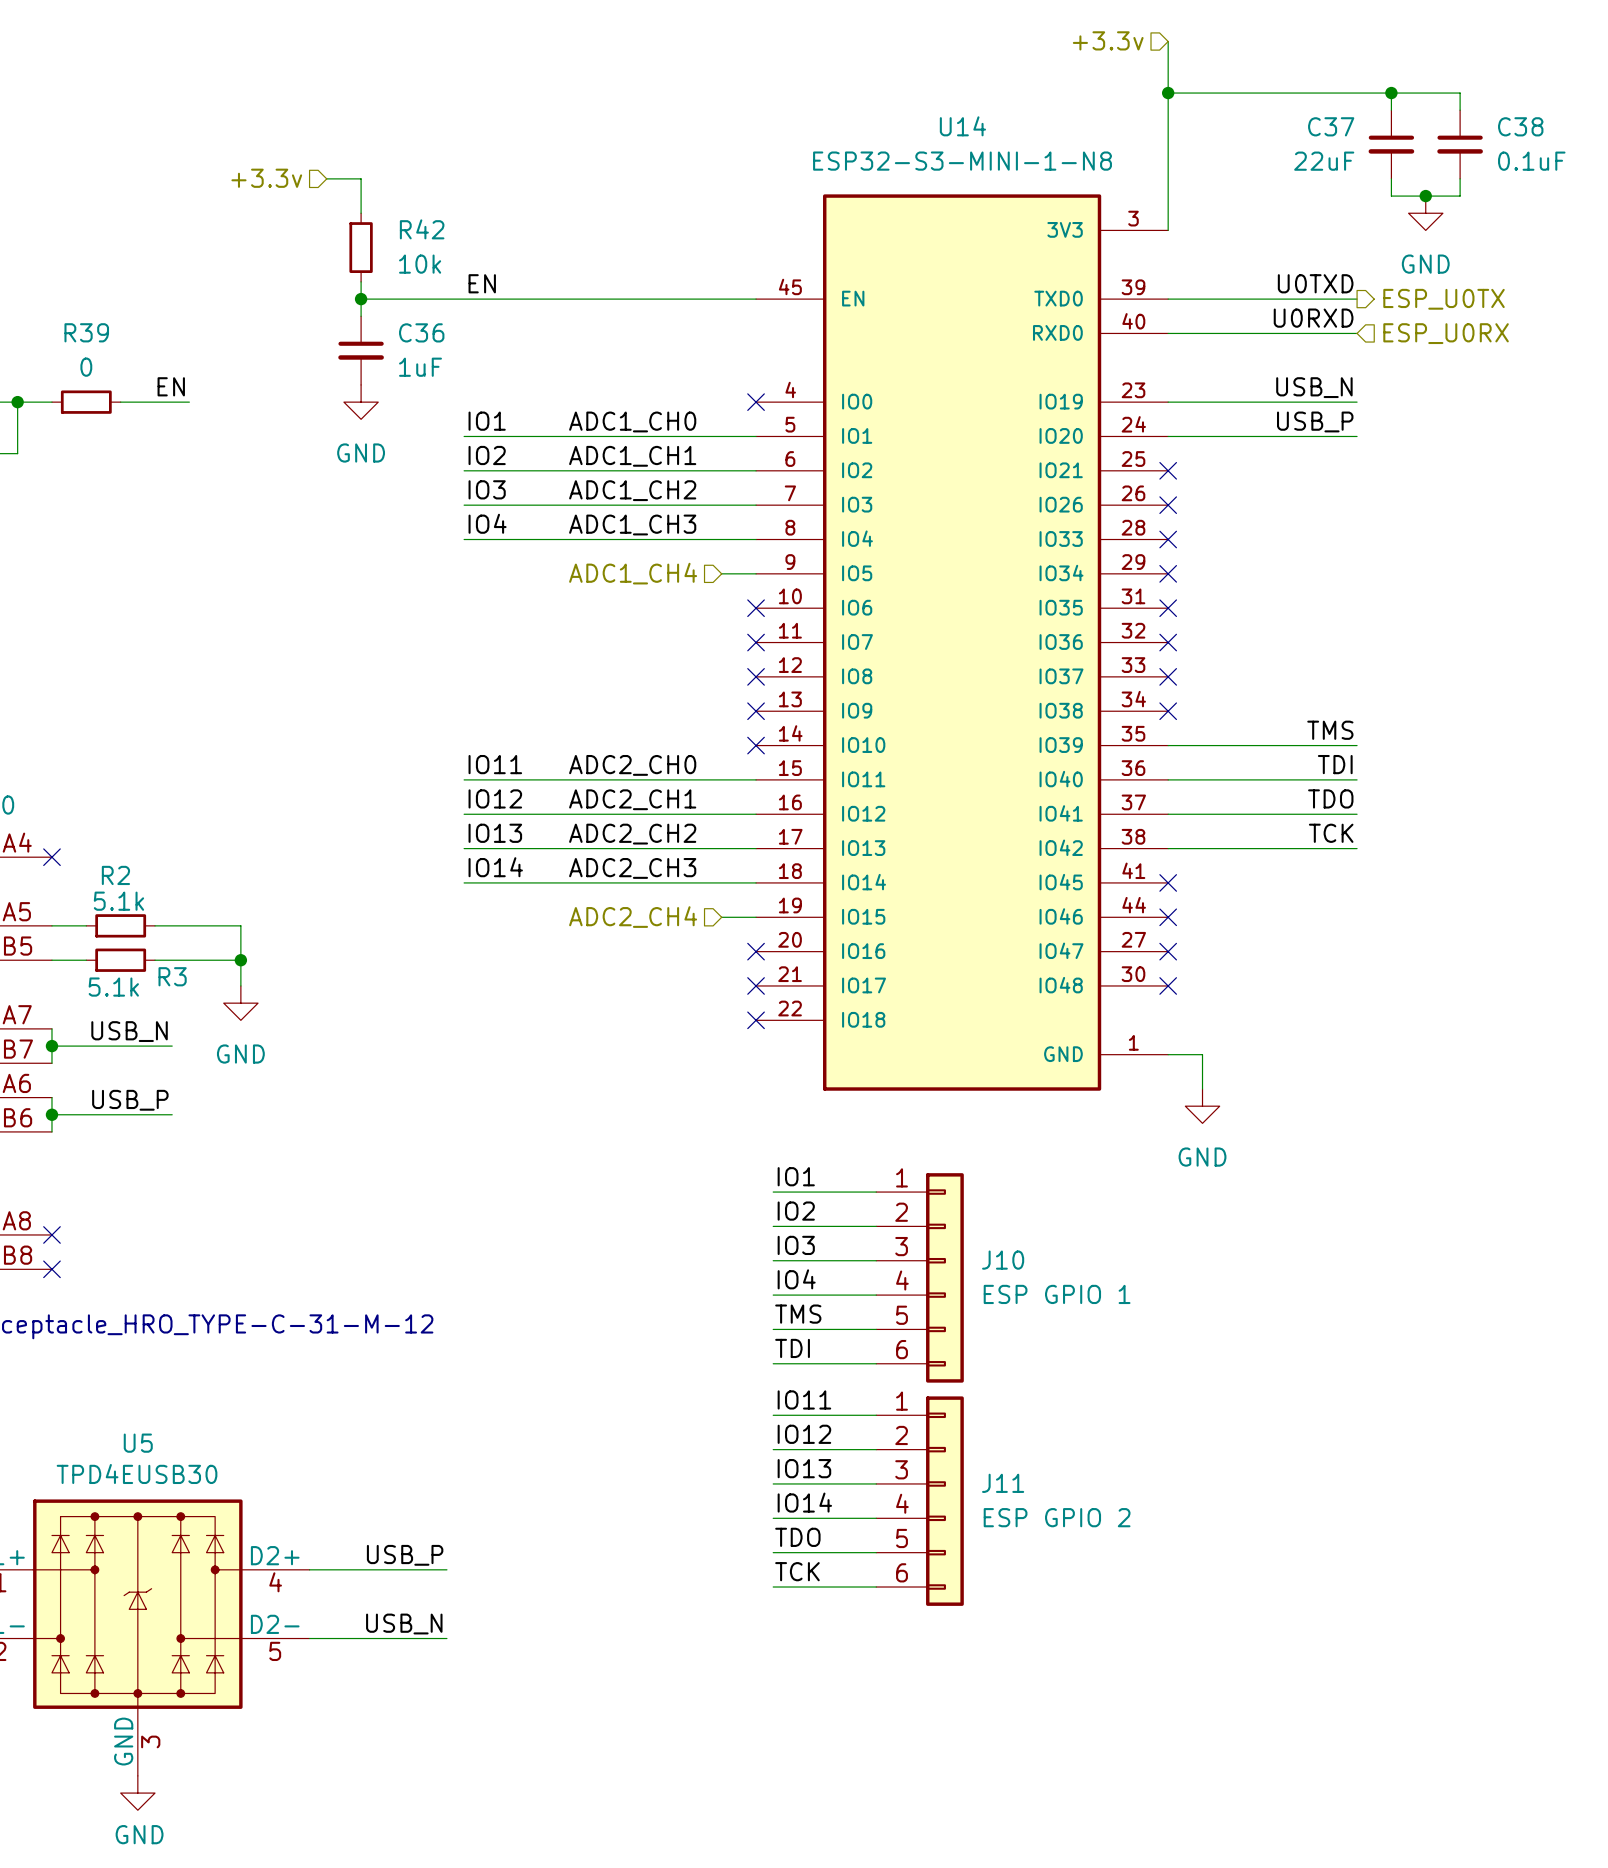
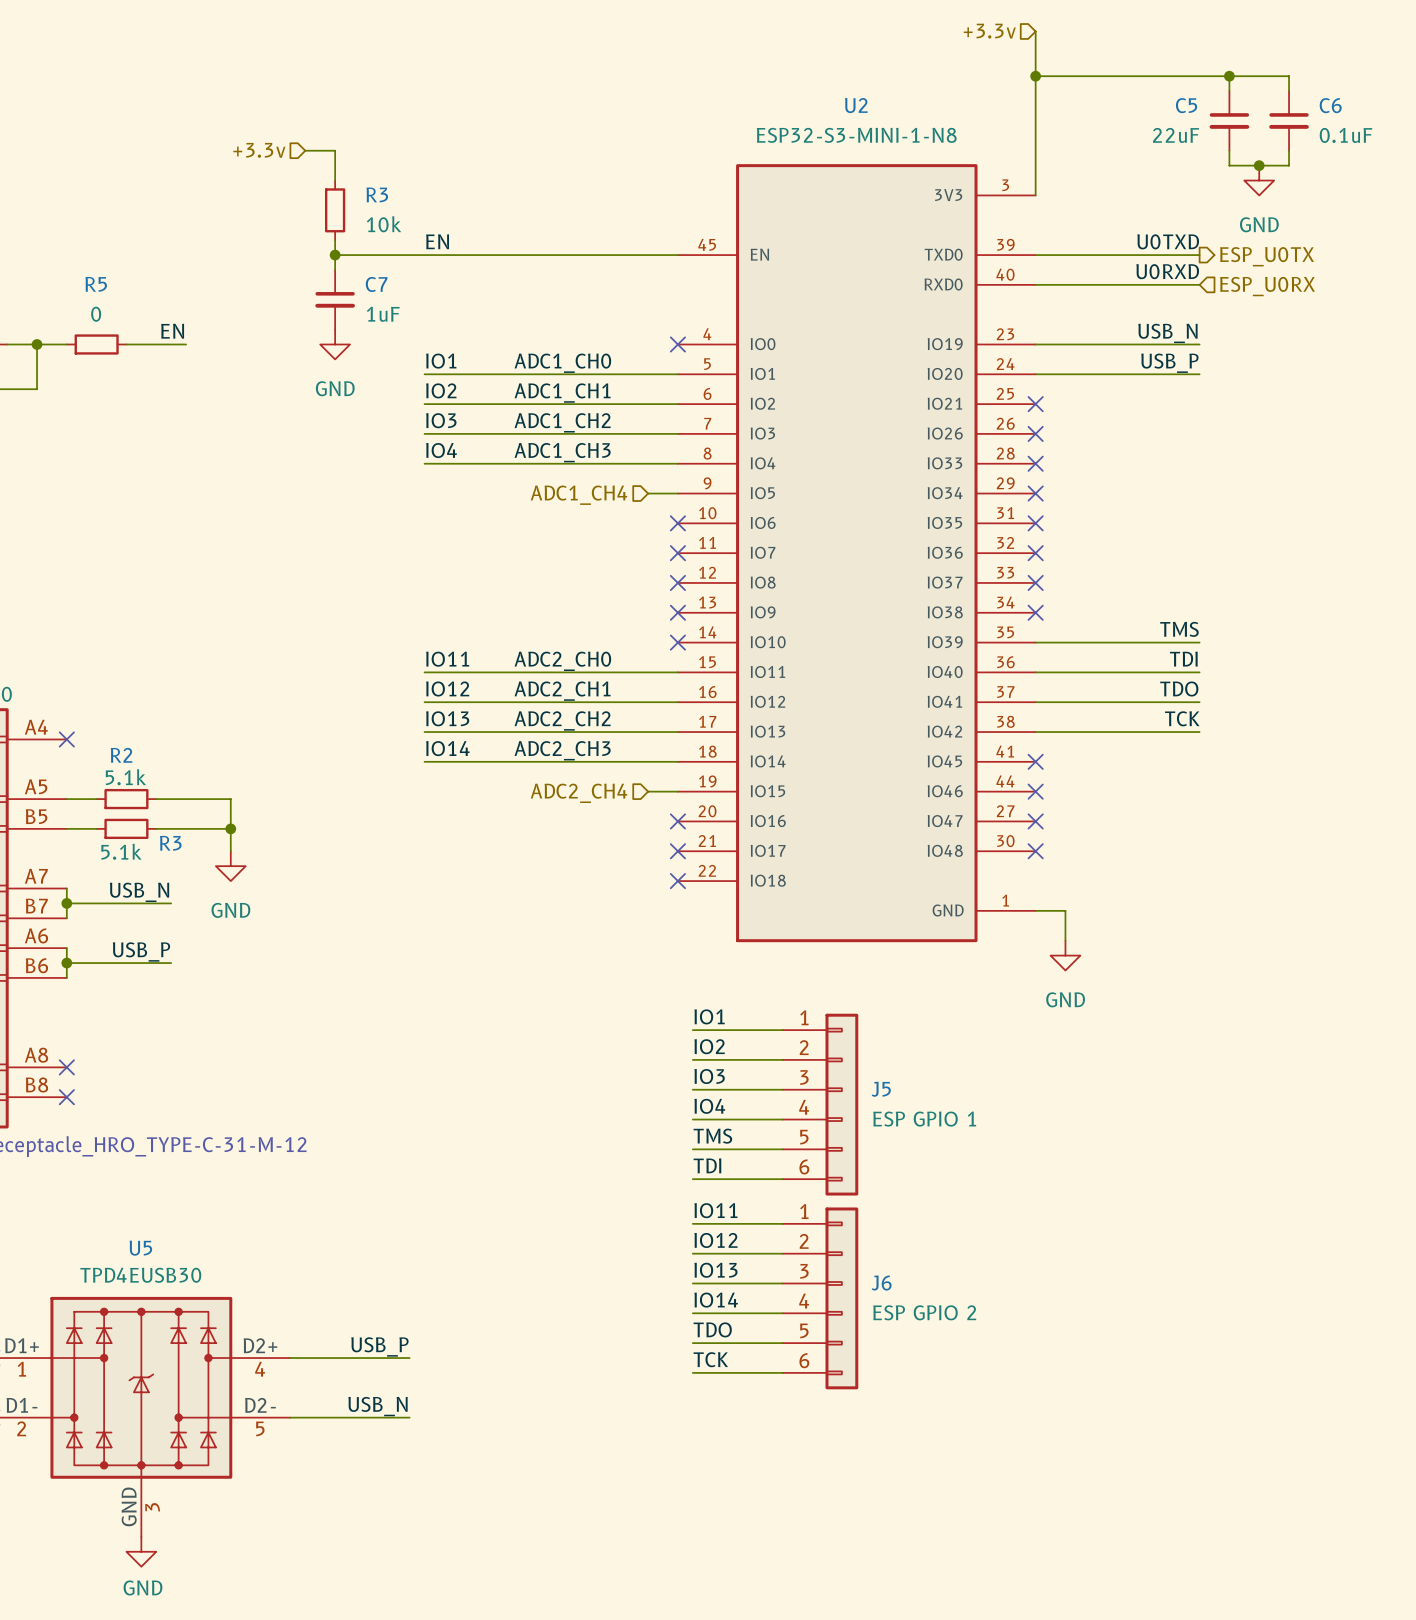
U14 name: U14 (962, 126) -> U2 (856, 105)
C37 name: C37 (1331, 126) -> C5 (1186, 105)
C38 name: C38 (1520, 126) -> C6 (1330, 105)
R42 name: R42 (422, 229) -> R3 (377, 194)
R39 name: R39 (86, 332) -> R5 (96, 284)
C36 name: C36 (421, 332) -> C7 (376, 284)
J10 name: J10 (1003, 1260) -> J5 (881, 1089)
J11 name: J11 (1003, 1483) -> J6 (881, 1283)

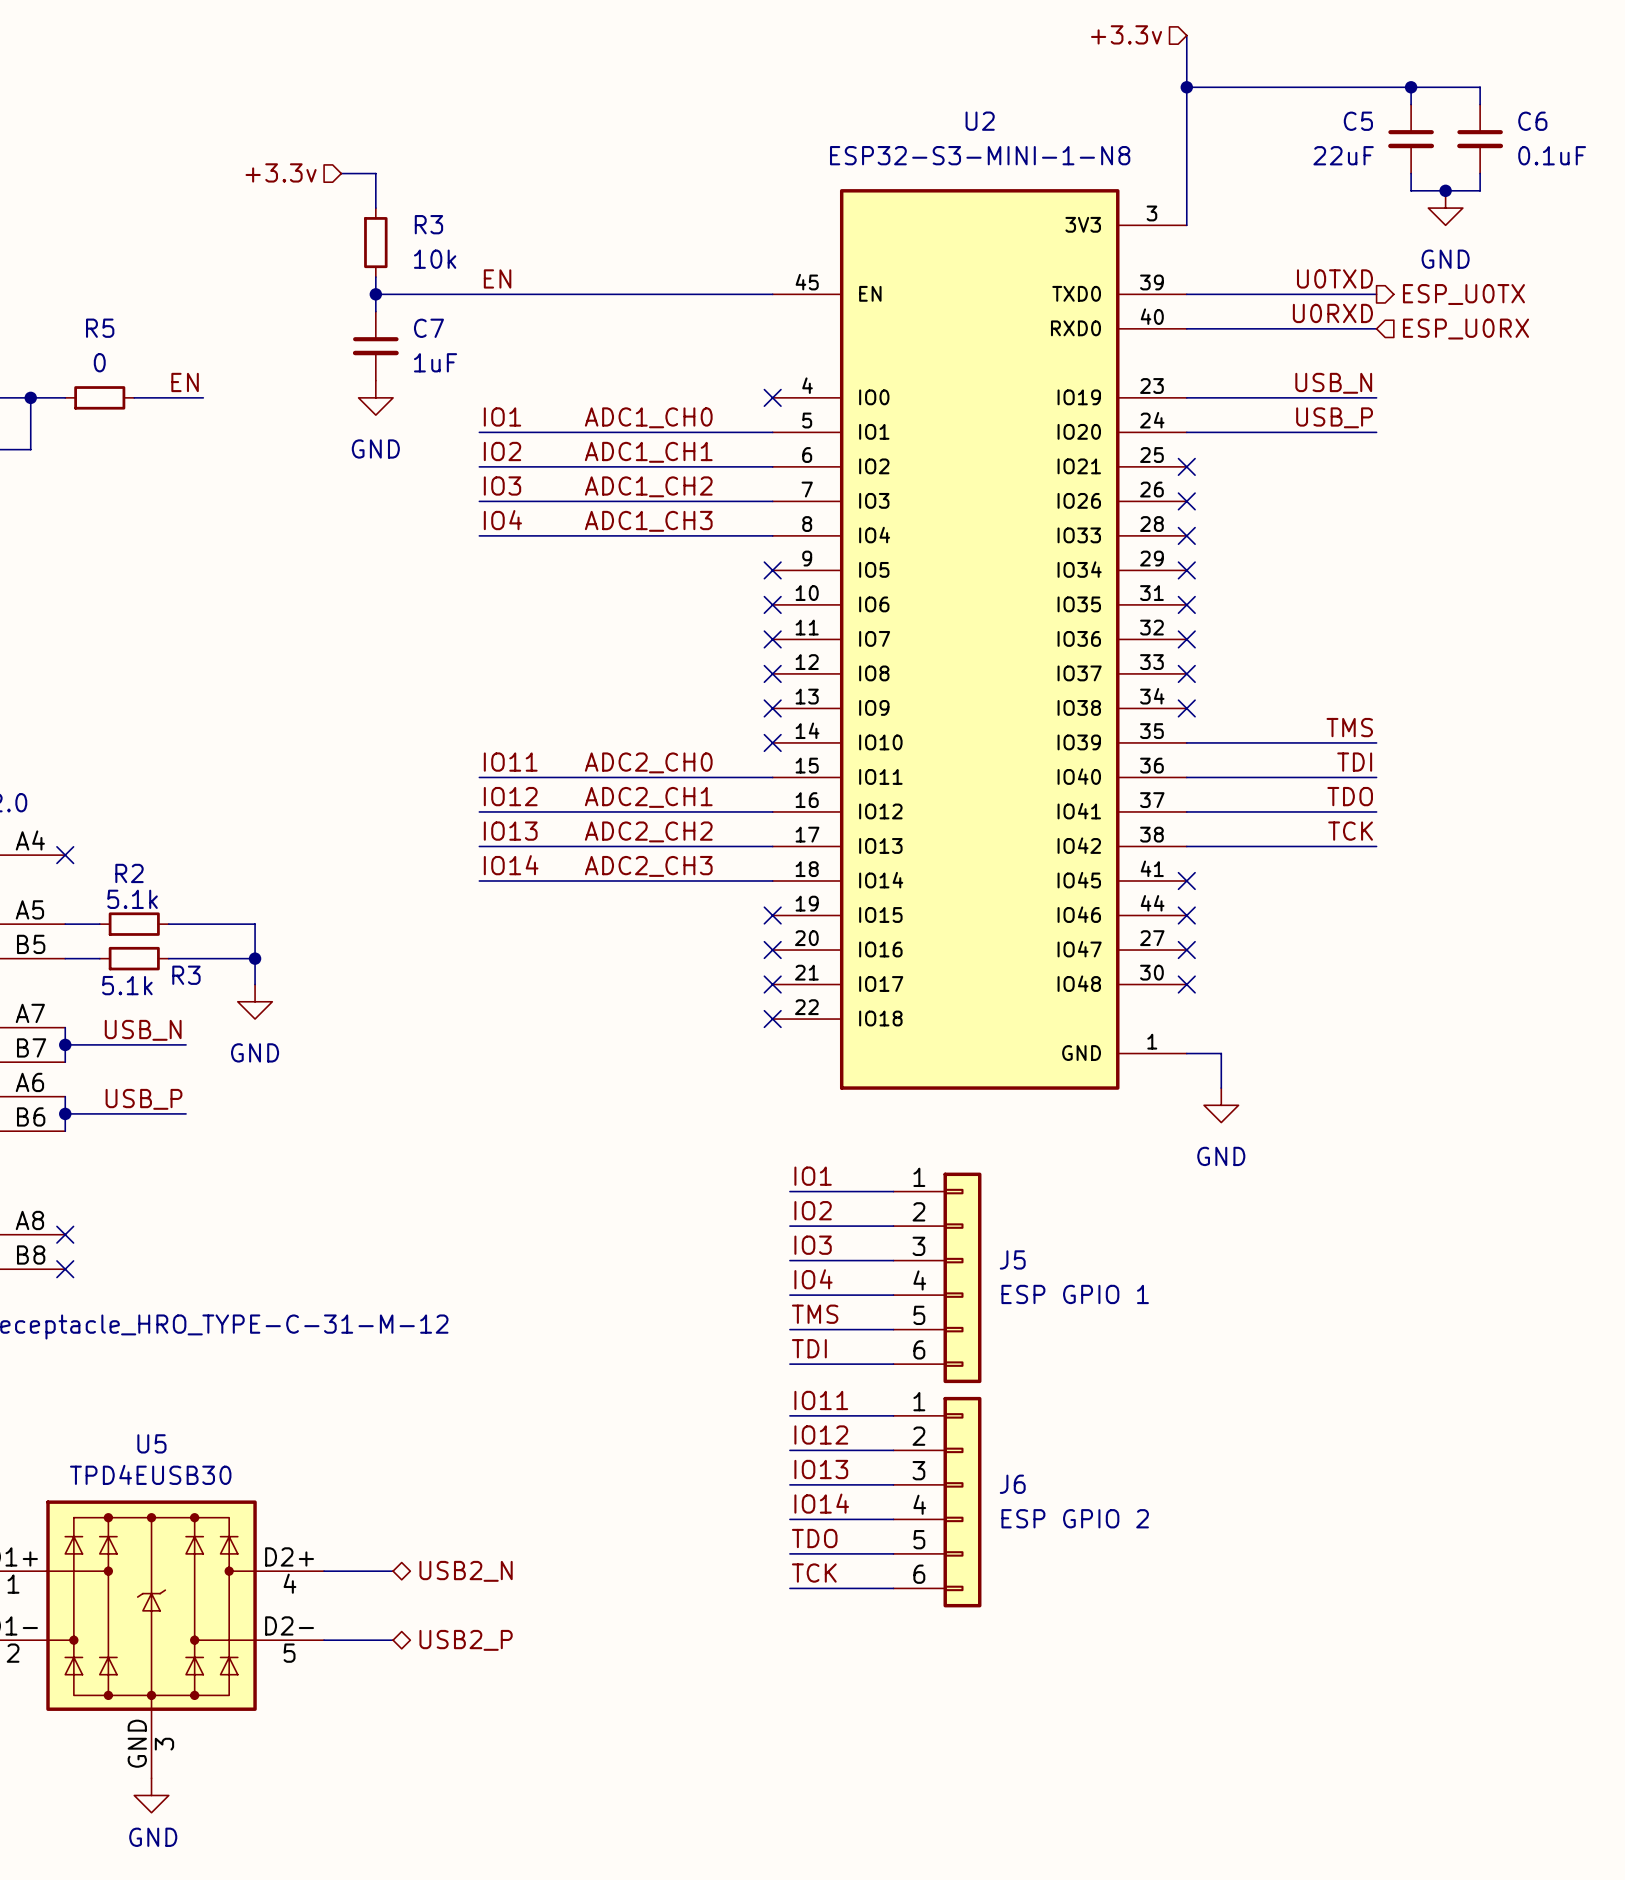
wire: (648, 493) (677, 493) -> none
no-connect mark: none -> (772, 570)
hierarchical label: ADC1_CH4 (578, 495) -> none
wire: (648, 791) (677, 791) -> none
no-connect mark: none -> (772, 915)
hierarchical label: ADC2_CH4 (578, 793) -> none
label: USB_P (379, 1346) -> none
wire: (350, 1358) (409, 1358) -> none
hierarchical label: none -> USB2_N (466, 1571)
label: USB_N (377, 1406) -> none
wire: (350, 1417) (409, 1417) -> none
hierarchical label: none -> USB2_P (466, 1640)

